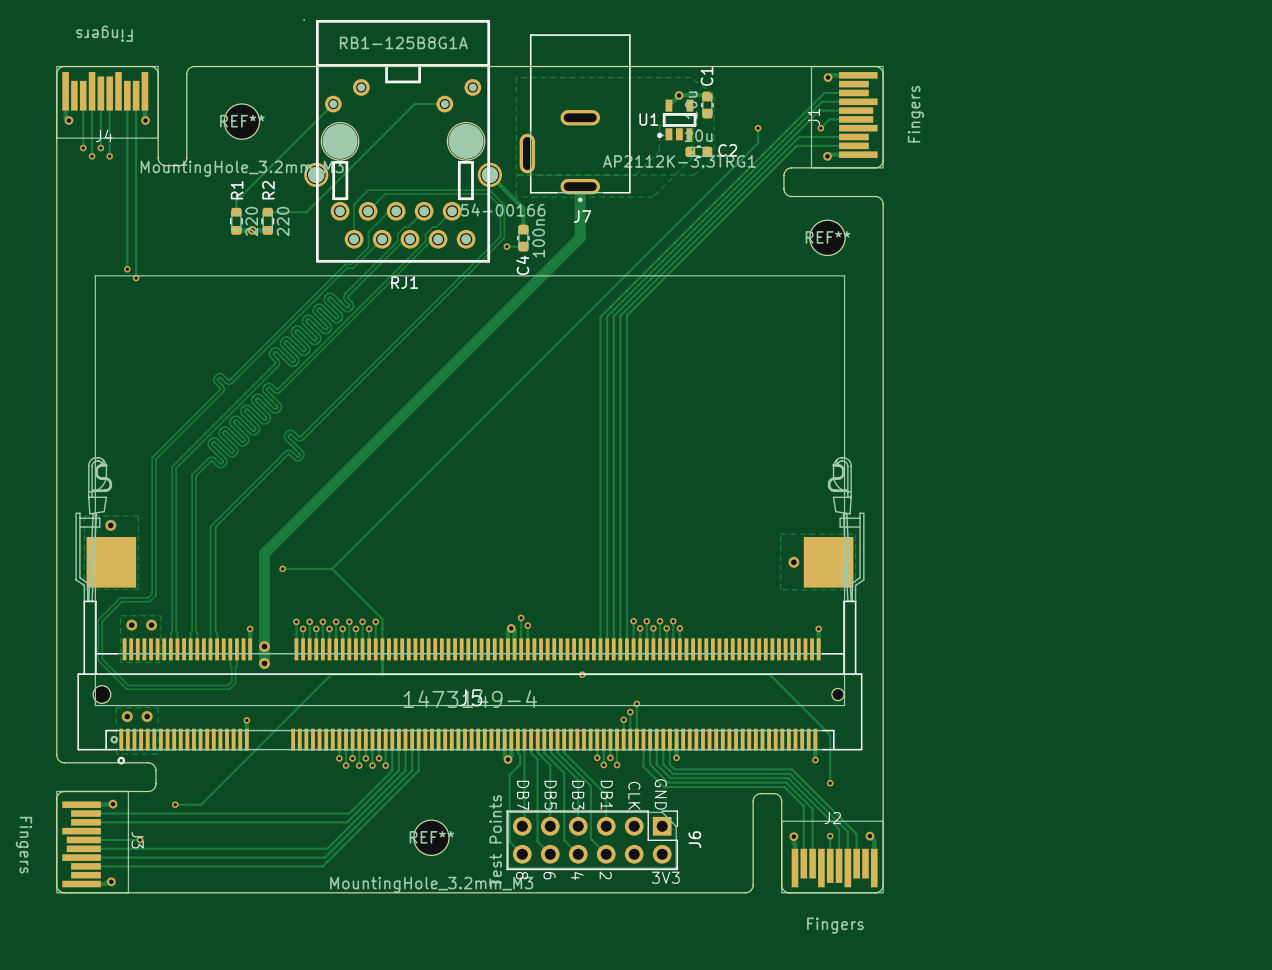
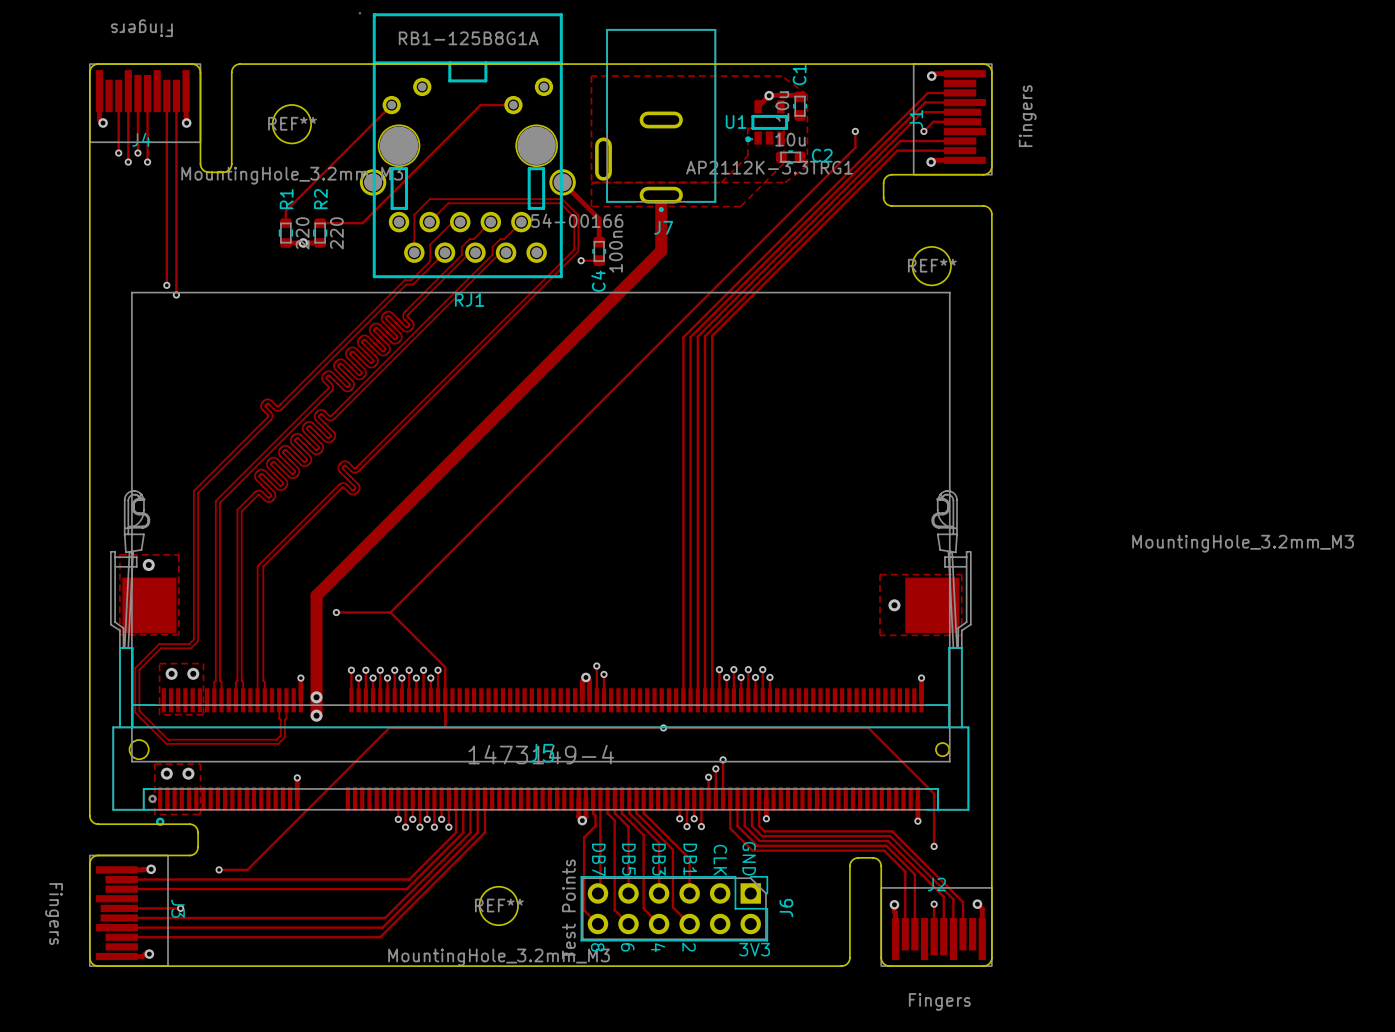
REF**: (827, 237) -> none
REF**: none -> MountingHole_3.2mm_M3 (931, 266)

